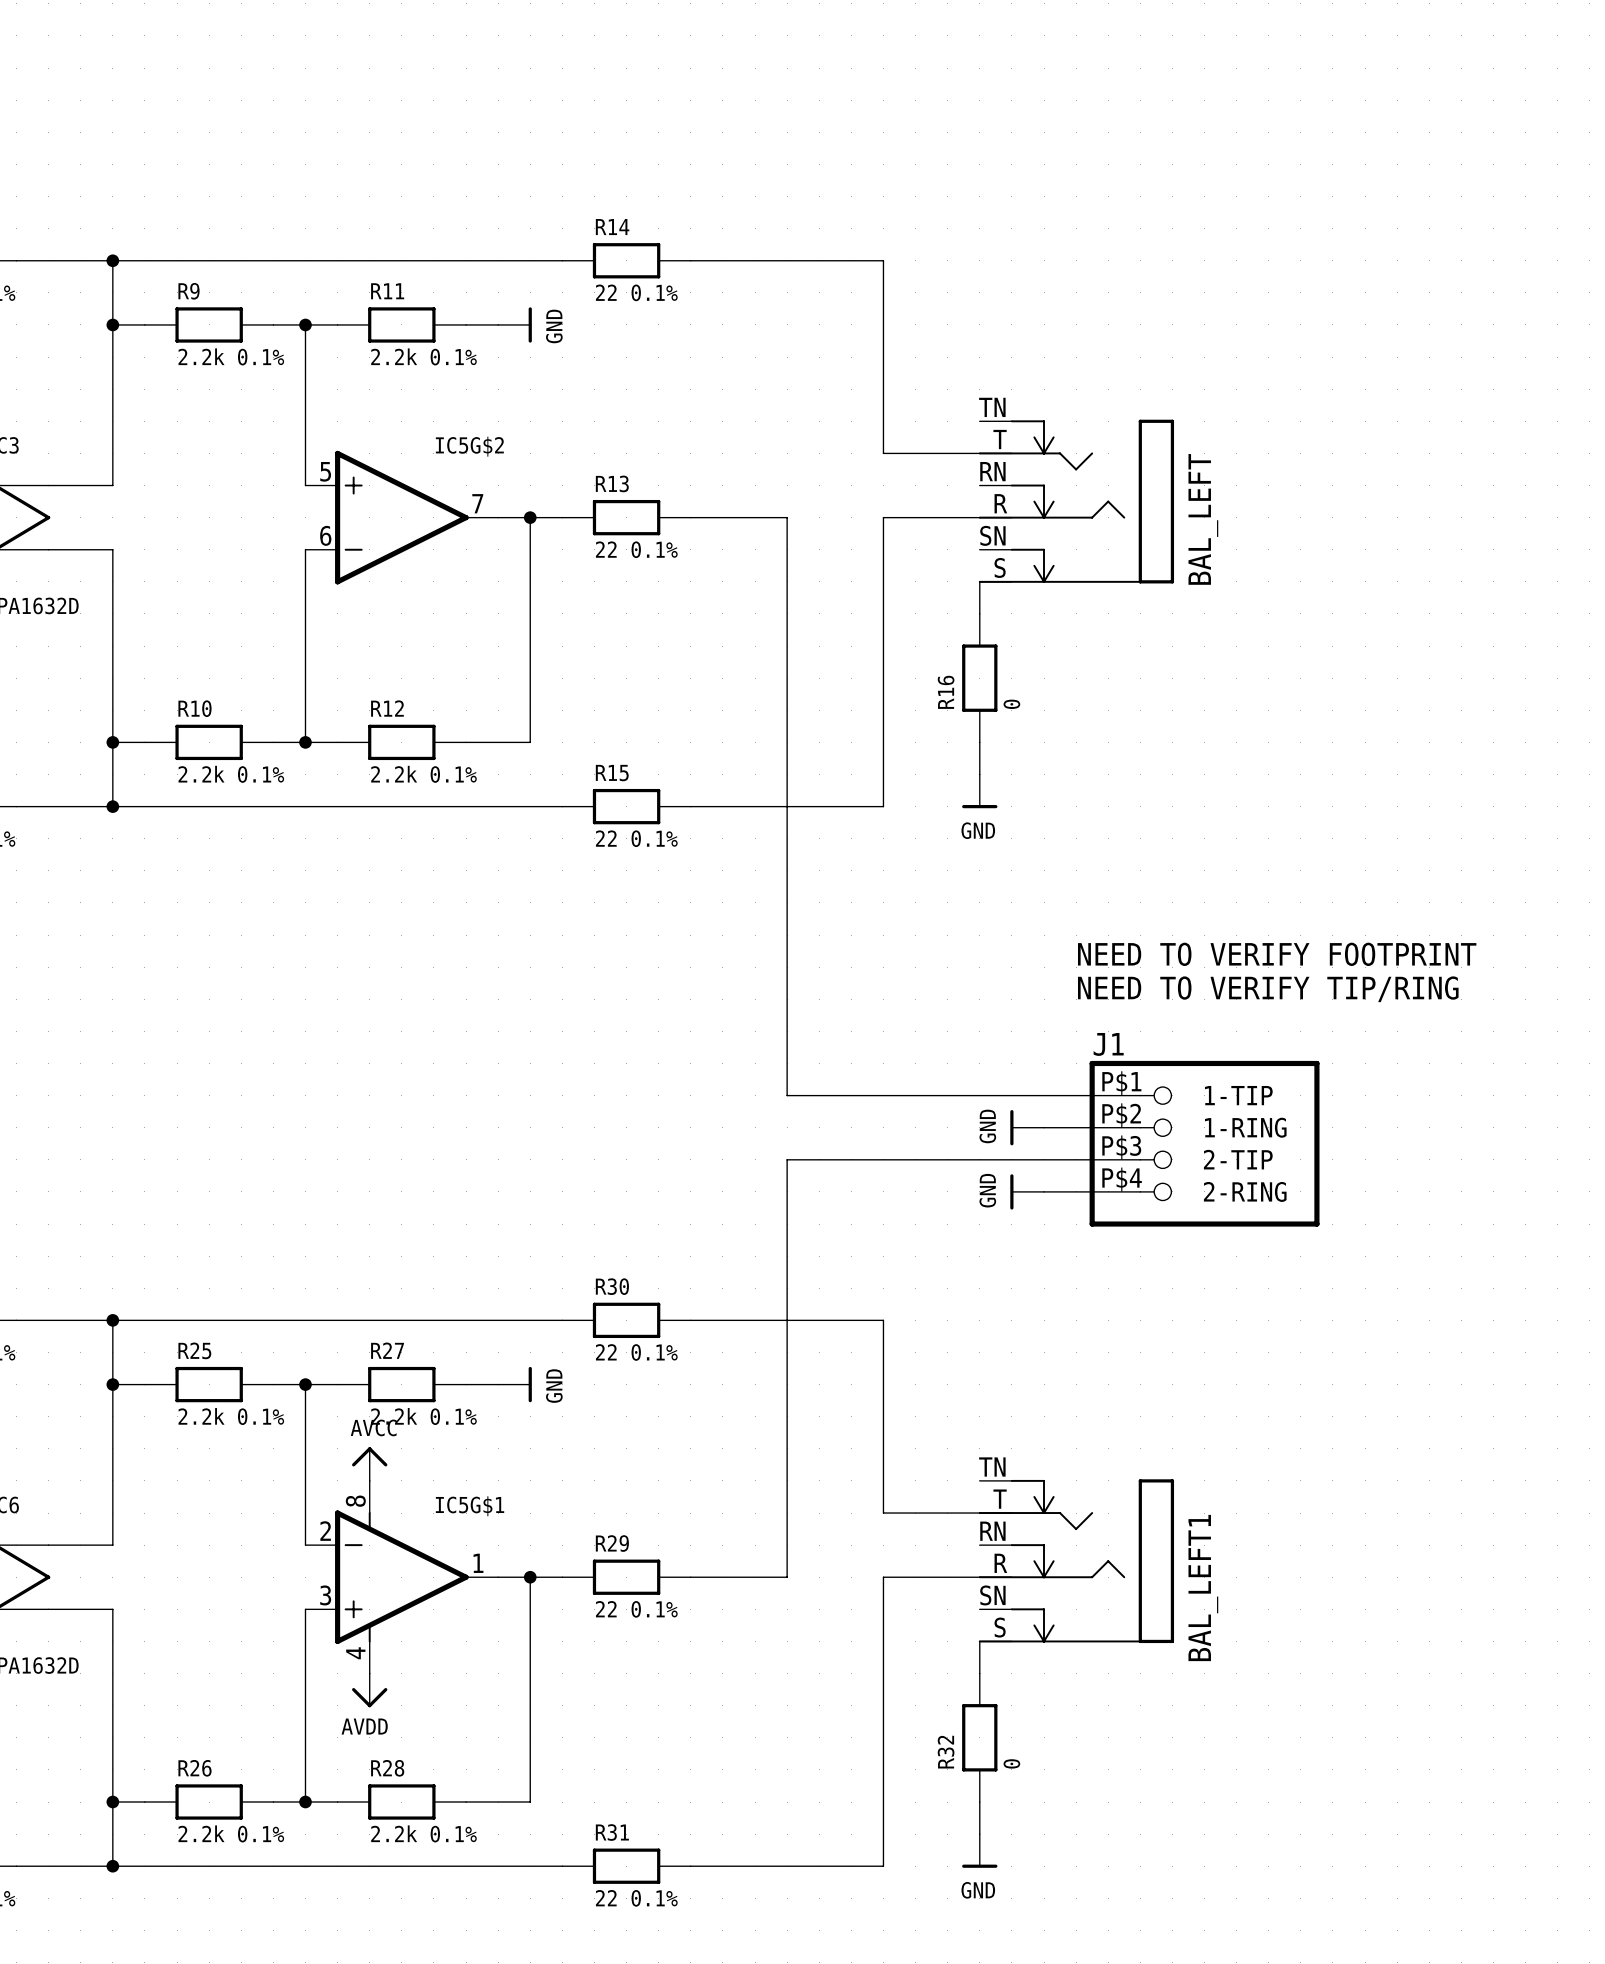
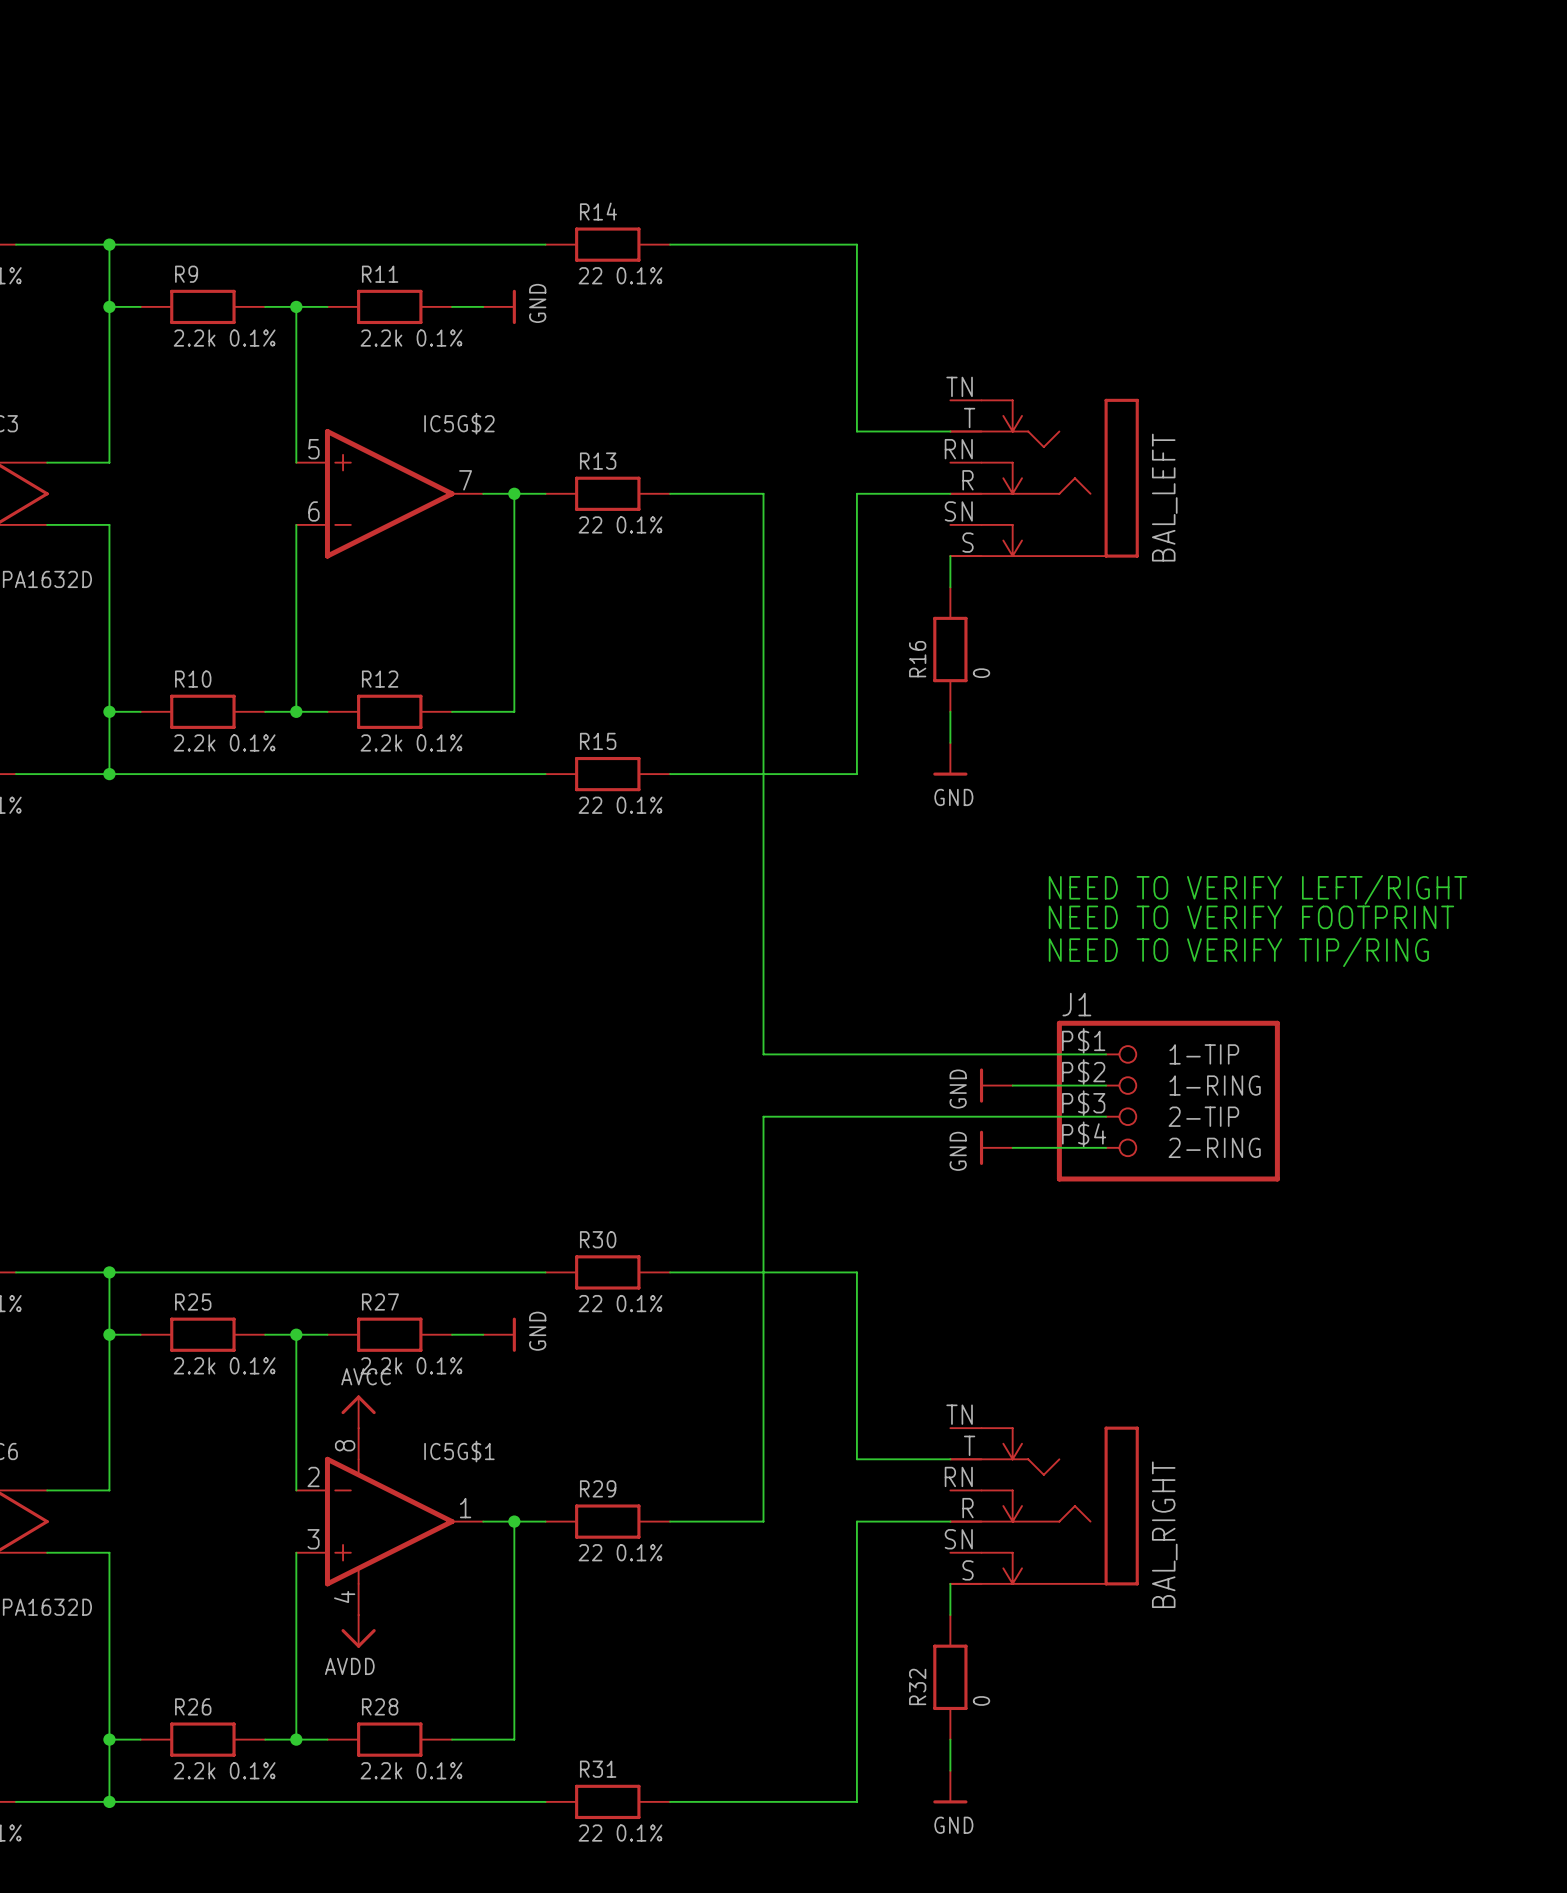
text: none -> NEED TO VERIFY LEFT/RIGHT (1258, 889)
BAL_LEFT1 name: BAL_LEFT1 (1203, 1588) -> BAL_RIGHT (1164, 1534)

